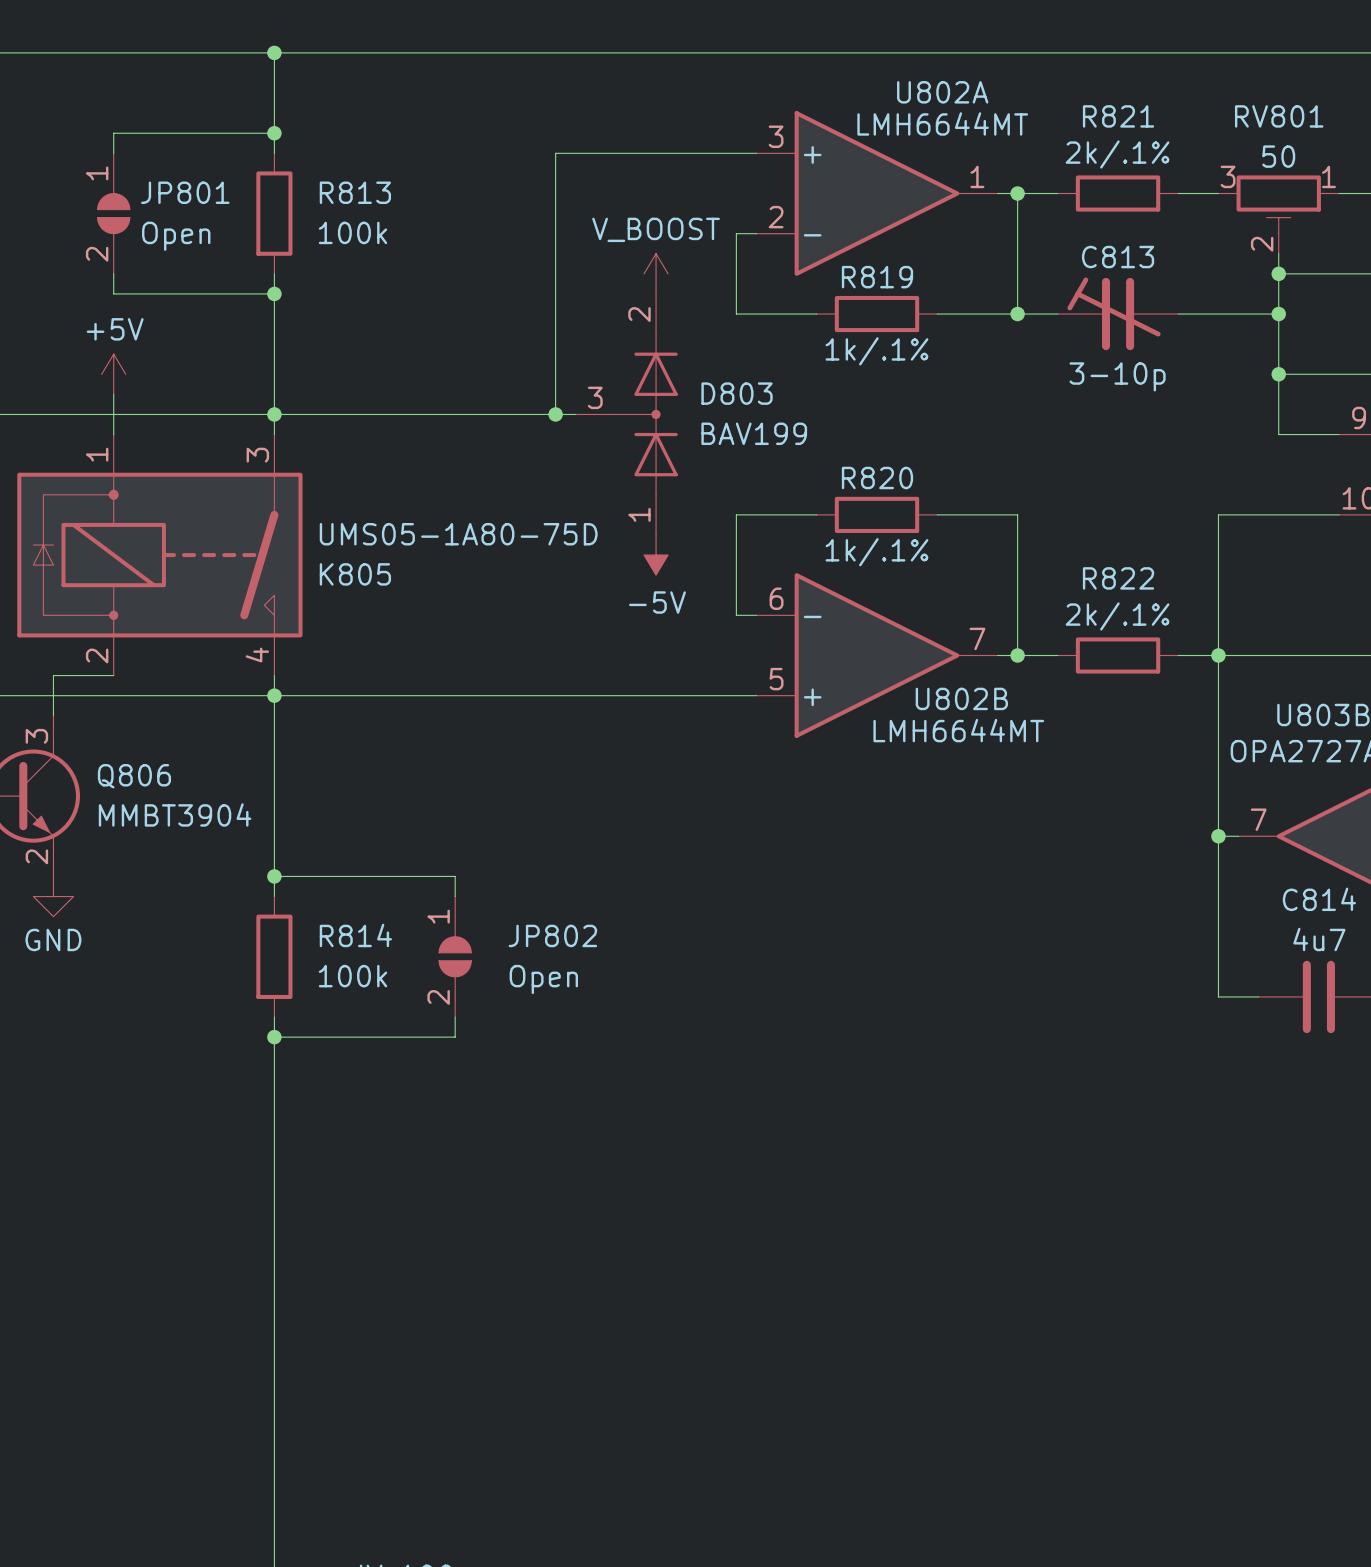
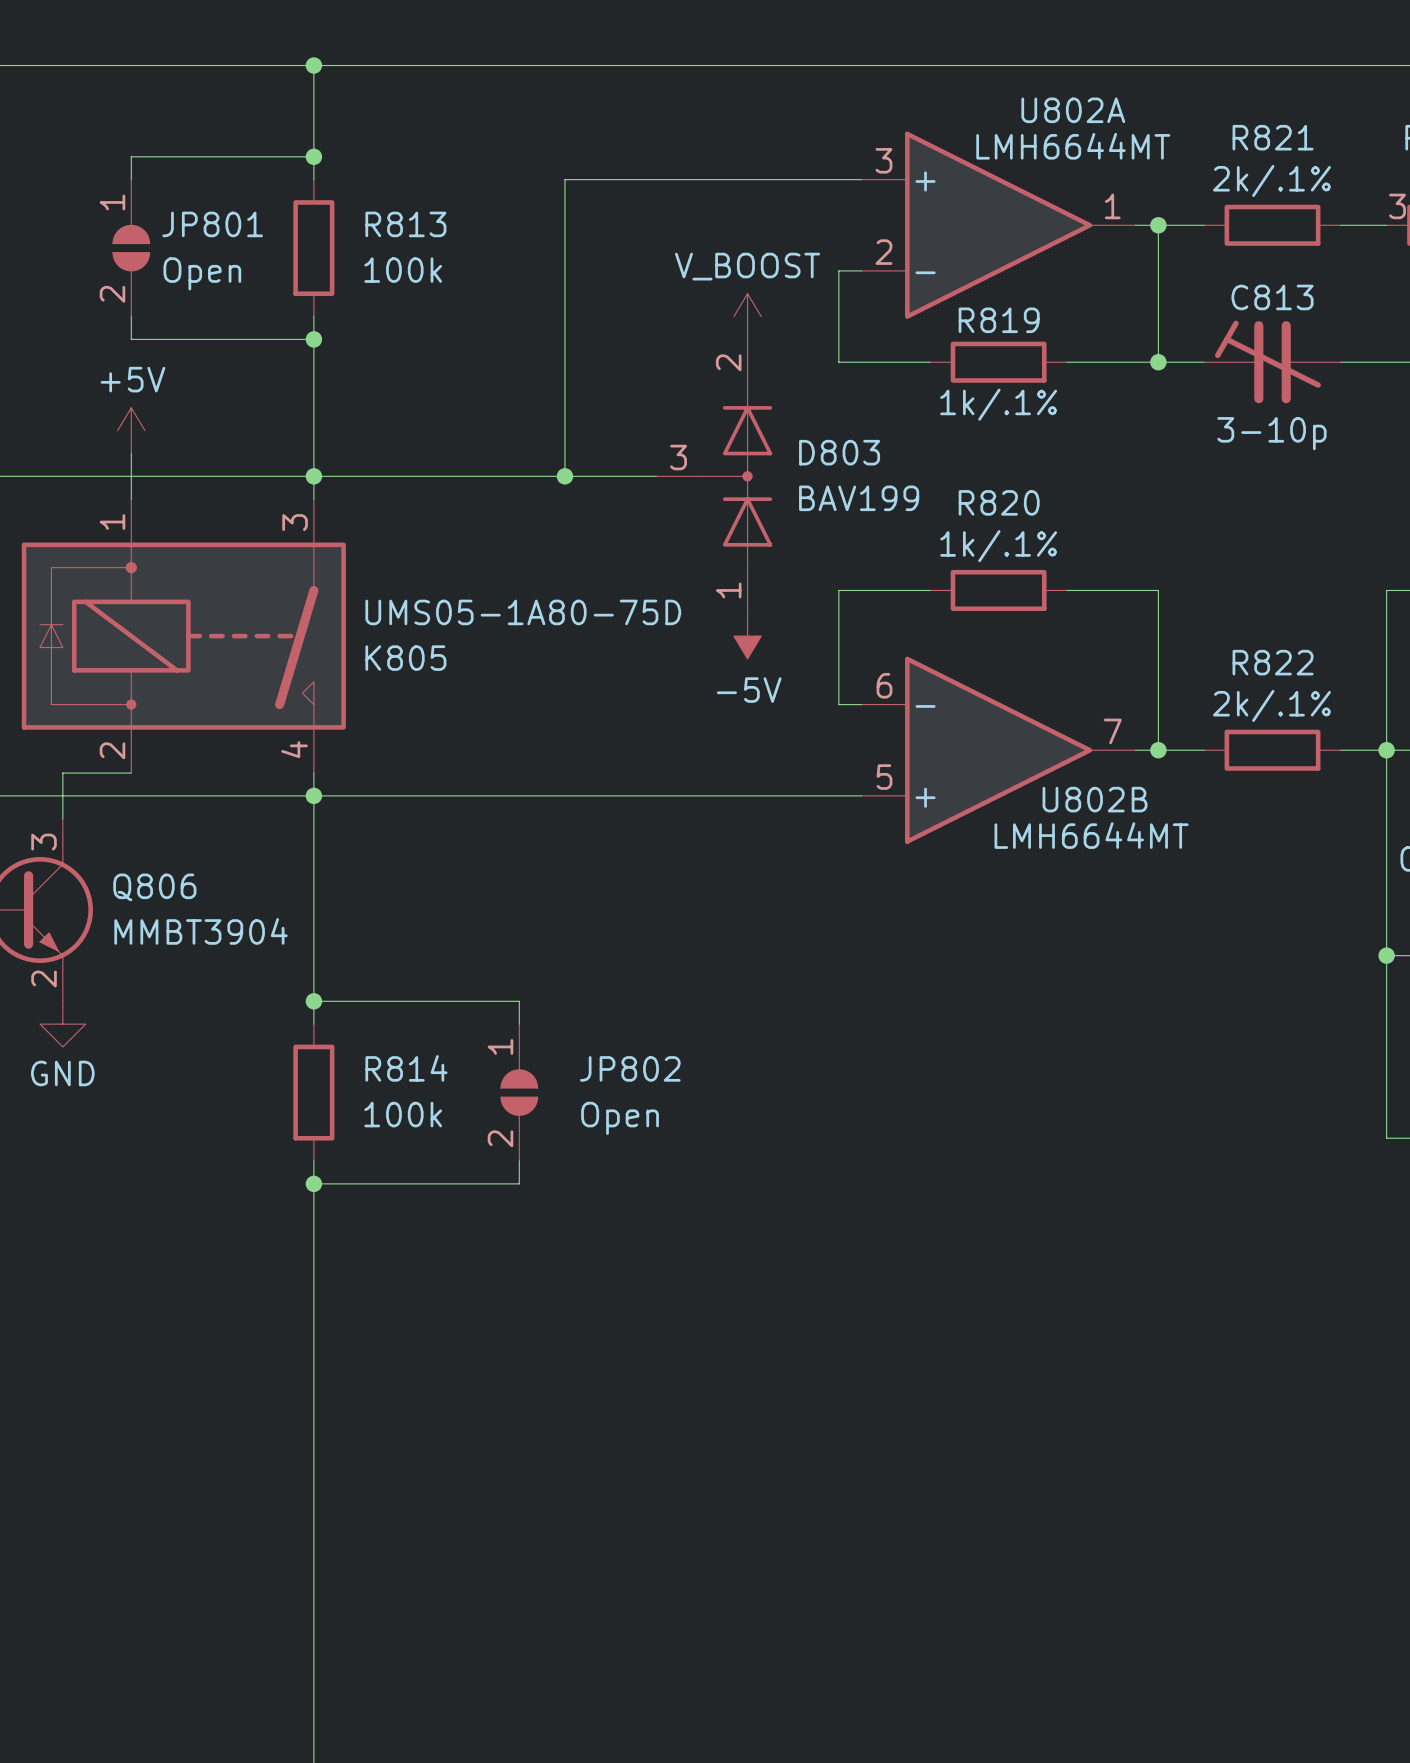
wire: (555, 153) (555, 414) -> (633, 179) (564, 179) (564, 476)
junction position: (555, 414) -> (564, 476)
R820 name position: R820 (877, 477) -> R820 (999, 502)
R820 value position: 1k/.1% (877, 552) -> 1k/.1% (998, 546)

